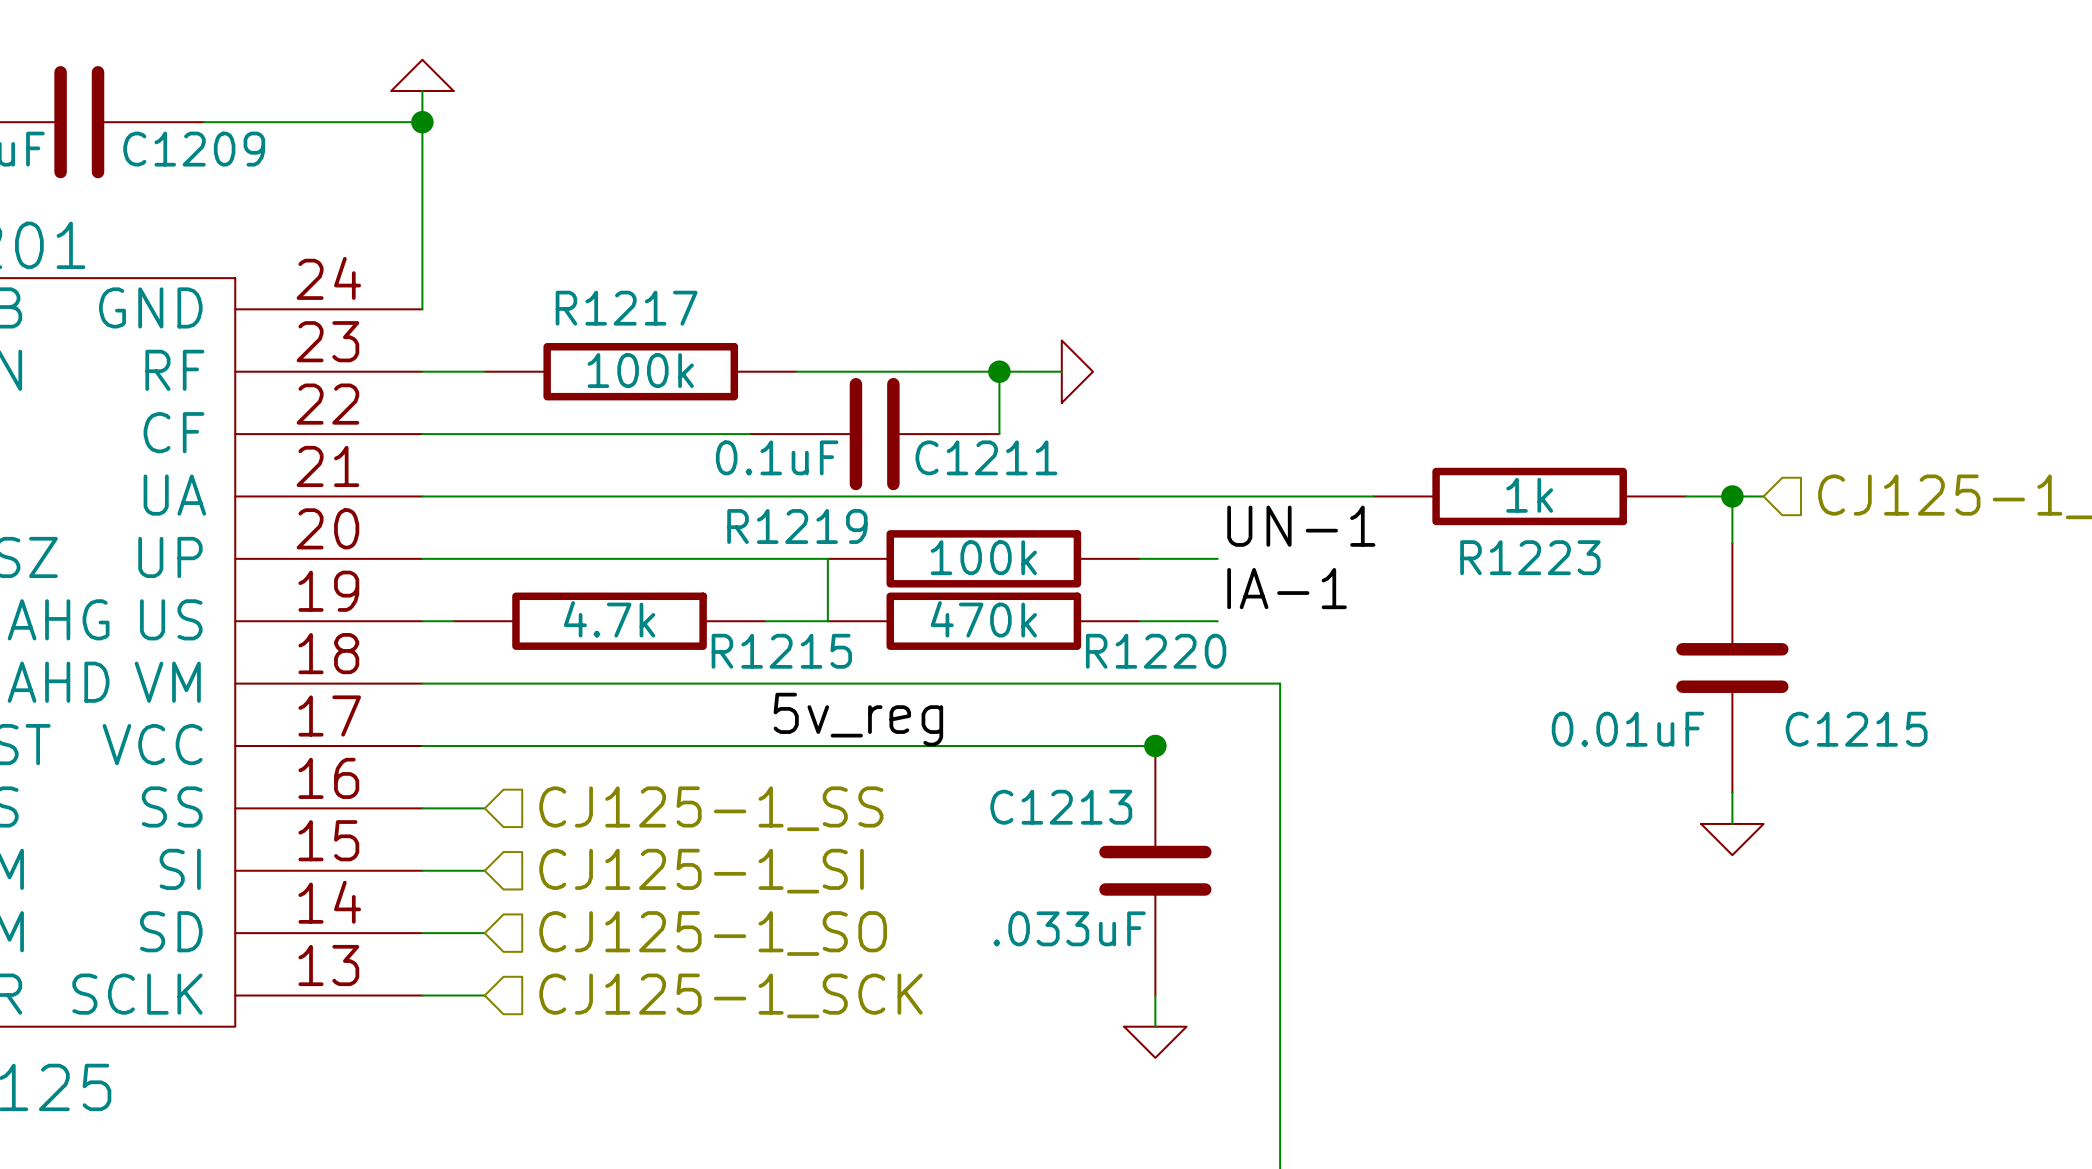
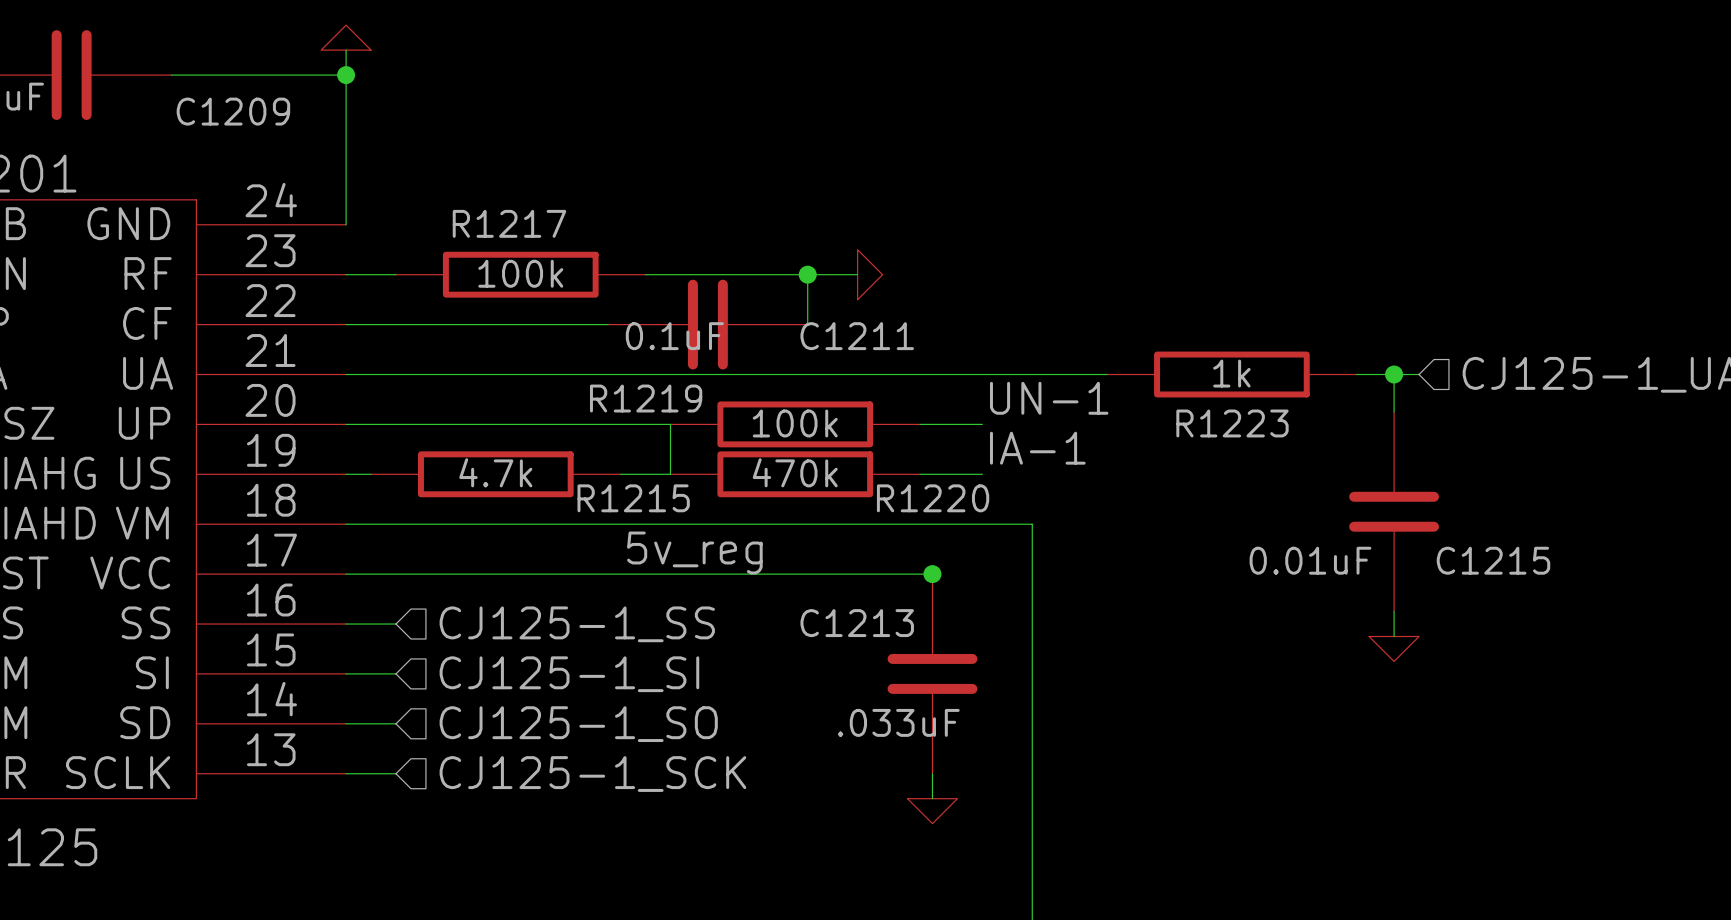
C1209 name position: C1209 (194, 149) -> C1209 (233, 111)
C1211 value position: 0.1uF (777, 457) -> 0.1uF (674, 336)
C1211 name position: C1211 (986, 457) -> C1211 (857, 336)
C1213 value position: .033uF (1069, 928) -> .033uF (898, 722)

